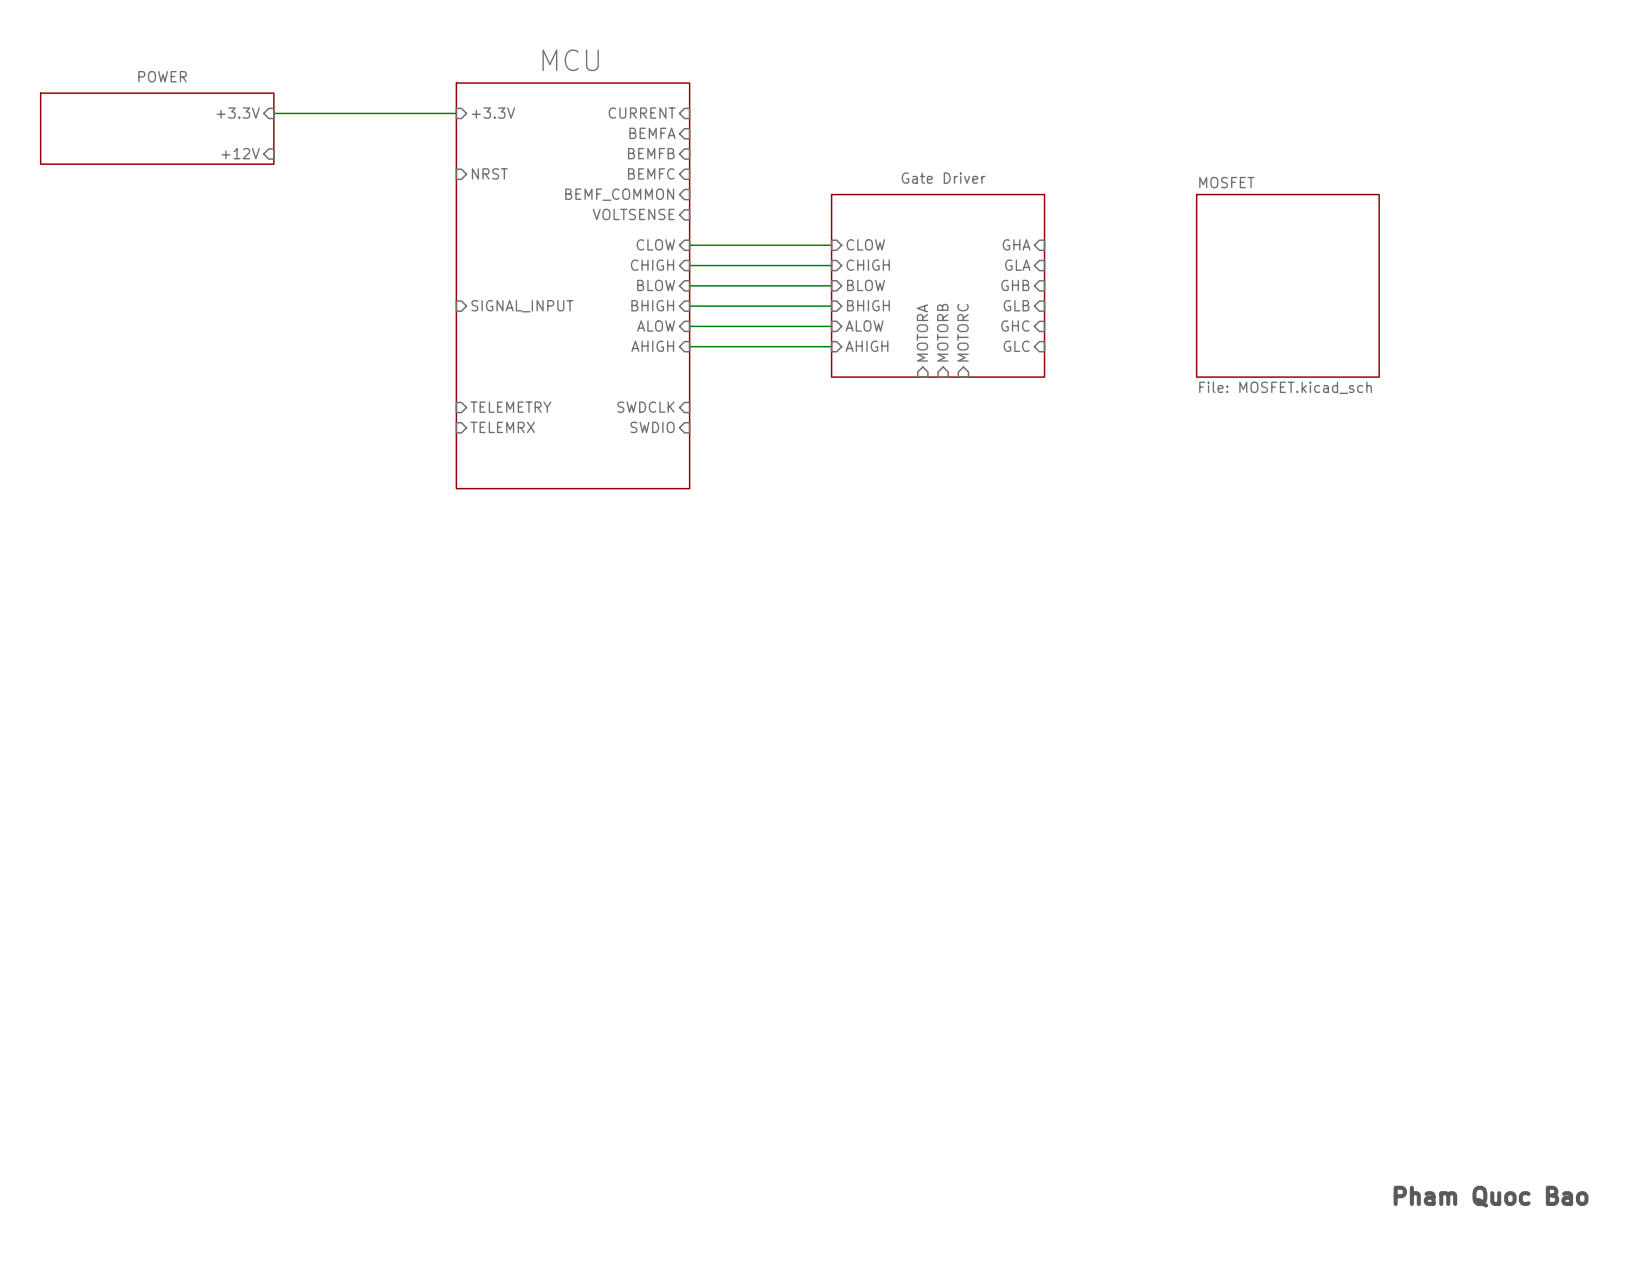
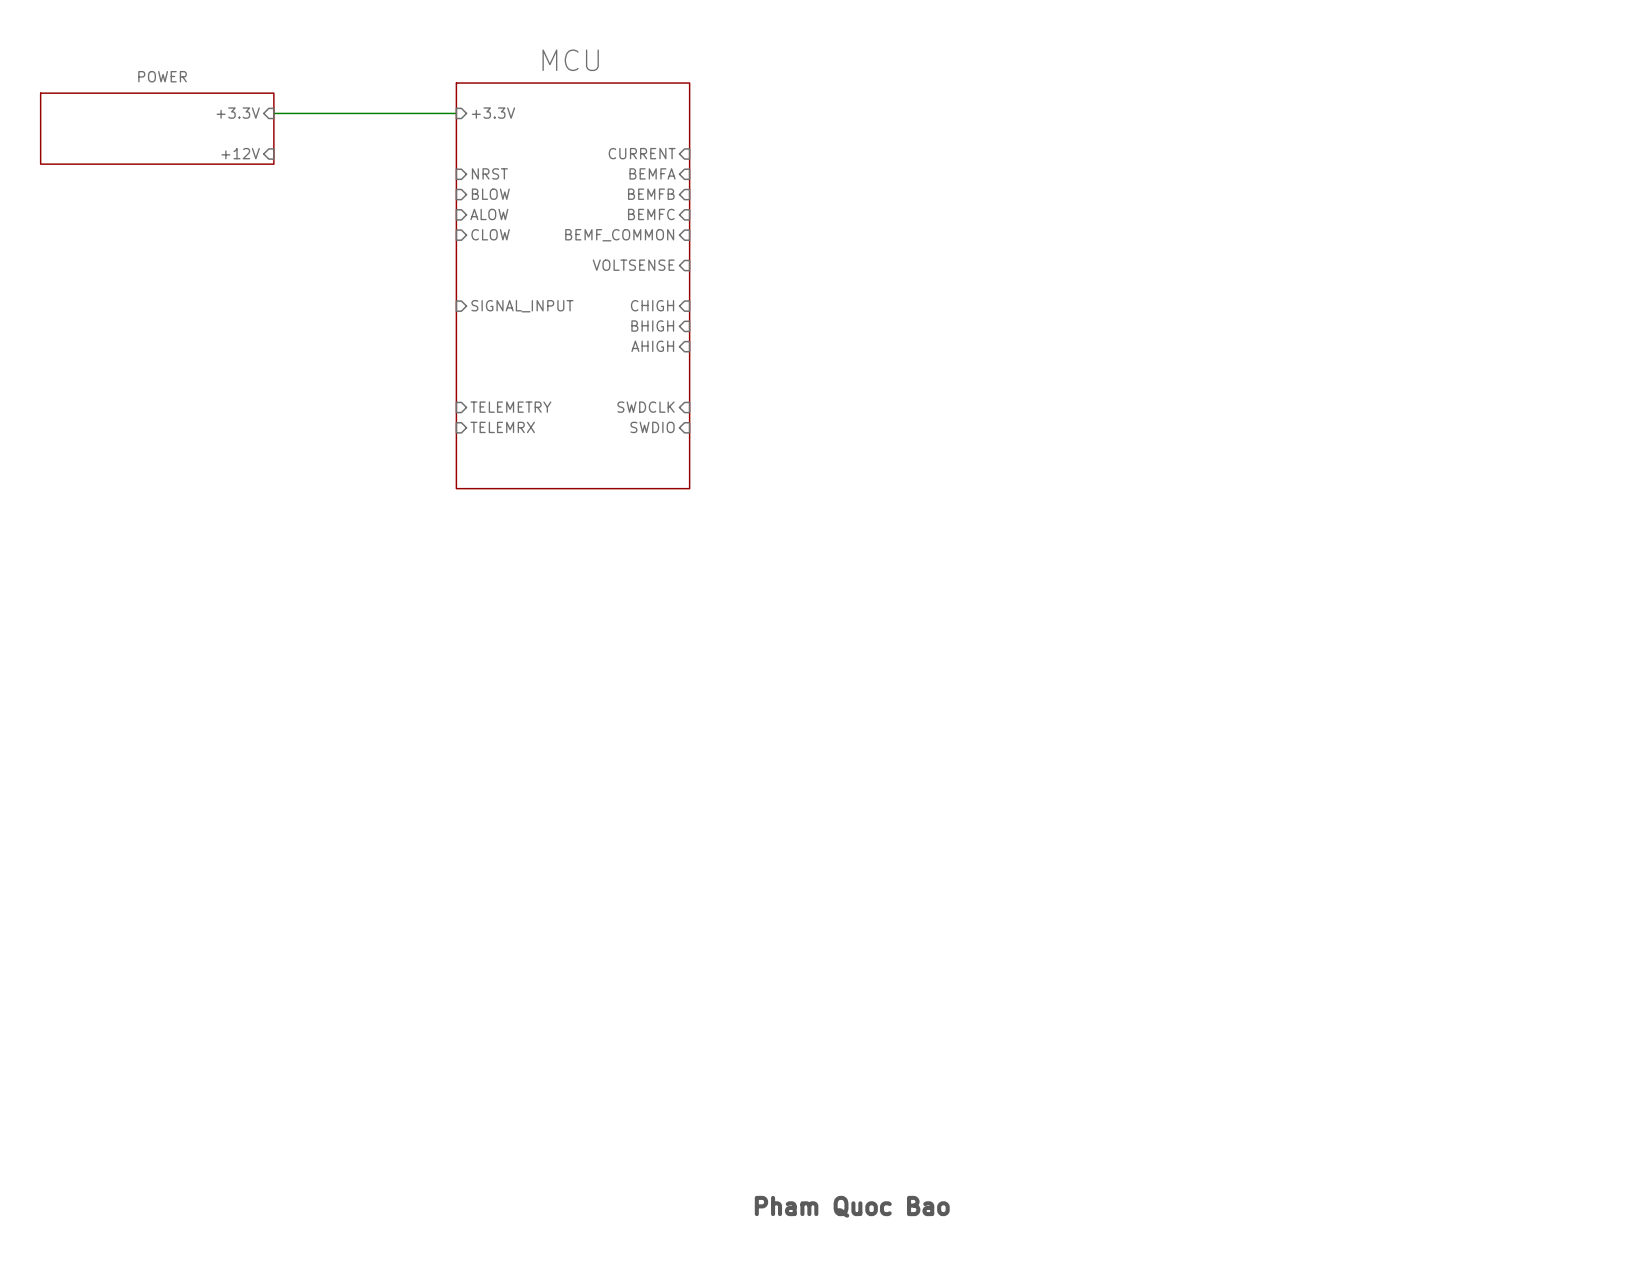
sheet pin: CURRENT (642, 113) -> none
sheet pin: BEMFA (652, 133) -> none
sheet pin: BEMFB (651, 153) -> CURRENT (642, 153)
sheet pin: BEMFC (651, 173) -> BEMFA (652, 173)
sheet pin: none -> BLOW (490, 194)
sheet pin: BEMF_COMMON (619, 194) -> BEMFB (651, 194)
sheet pin: none -> ALOW (489, 214)
sheet pin: VOLTSENSE (633, 214) -> BEMFC (651, 214)
sheet pin: none -> CLOW (490, 234)
sheet pin: none -> BEMF_COMMON (619, 235)
sheet pin: CLOW (655, 244) -> none
sheet pin: CLOW (865, 244) -> none
sheet pin: GHA (1016, 244) -> none
wire: (689, 245) (831, 245) -> none
sheet pin: CHIGH (652, 265) -> VOLTSENSE (633, 265)
wire: (689, 265) (831, 265) -> none
sheet pin: CHIGH (868, 265) -> none
sheet pin: GLA (1017, 265) -> none
sheet pin: BLOW (656, 285) -> none
wire: (689, 285) (831, 285) -> none
sheet pin: BLOW (866, 285) -> none
sheet Gate Driver: (938, 285) -> none
sheet pin: GHB (1015, 285) -> none
sheet MOSFET: File: MOSFET.kicad_sch (1287, 285) -> none
sheet pin: BHIGH (652, 305) -> CHIGH (652, 305)
sheet pin: BHIGH (868, 305) -> none
sheet pin: GLB (1016, 305) -> none
wire: (689, 306) (831, 306) -> none
sheet pin: ALOW (656, 326) -> BHIGH (652, 326)
wire: (689, 326) (831, 326) -> none
sheet pin: ALOW (864, 326) -> none
sheet pin: GHC (1015, 326) -> none
sheet pin: MOTORB (942, 332) -> none
sheet pin: MOTORC (963, 332) -> none
sheet pin: MOTORA (922, 333) -> none
wire: (689, 346) (831, 346) -> none
sheet pin: AHIGH (866, 346) -> none
sheet pin: GLC (1016, 346) -> none
text: Pham Quoc Bao (1491, 1196) -> none
text: none -> Pham Quoc Bao (852, 1206)

